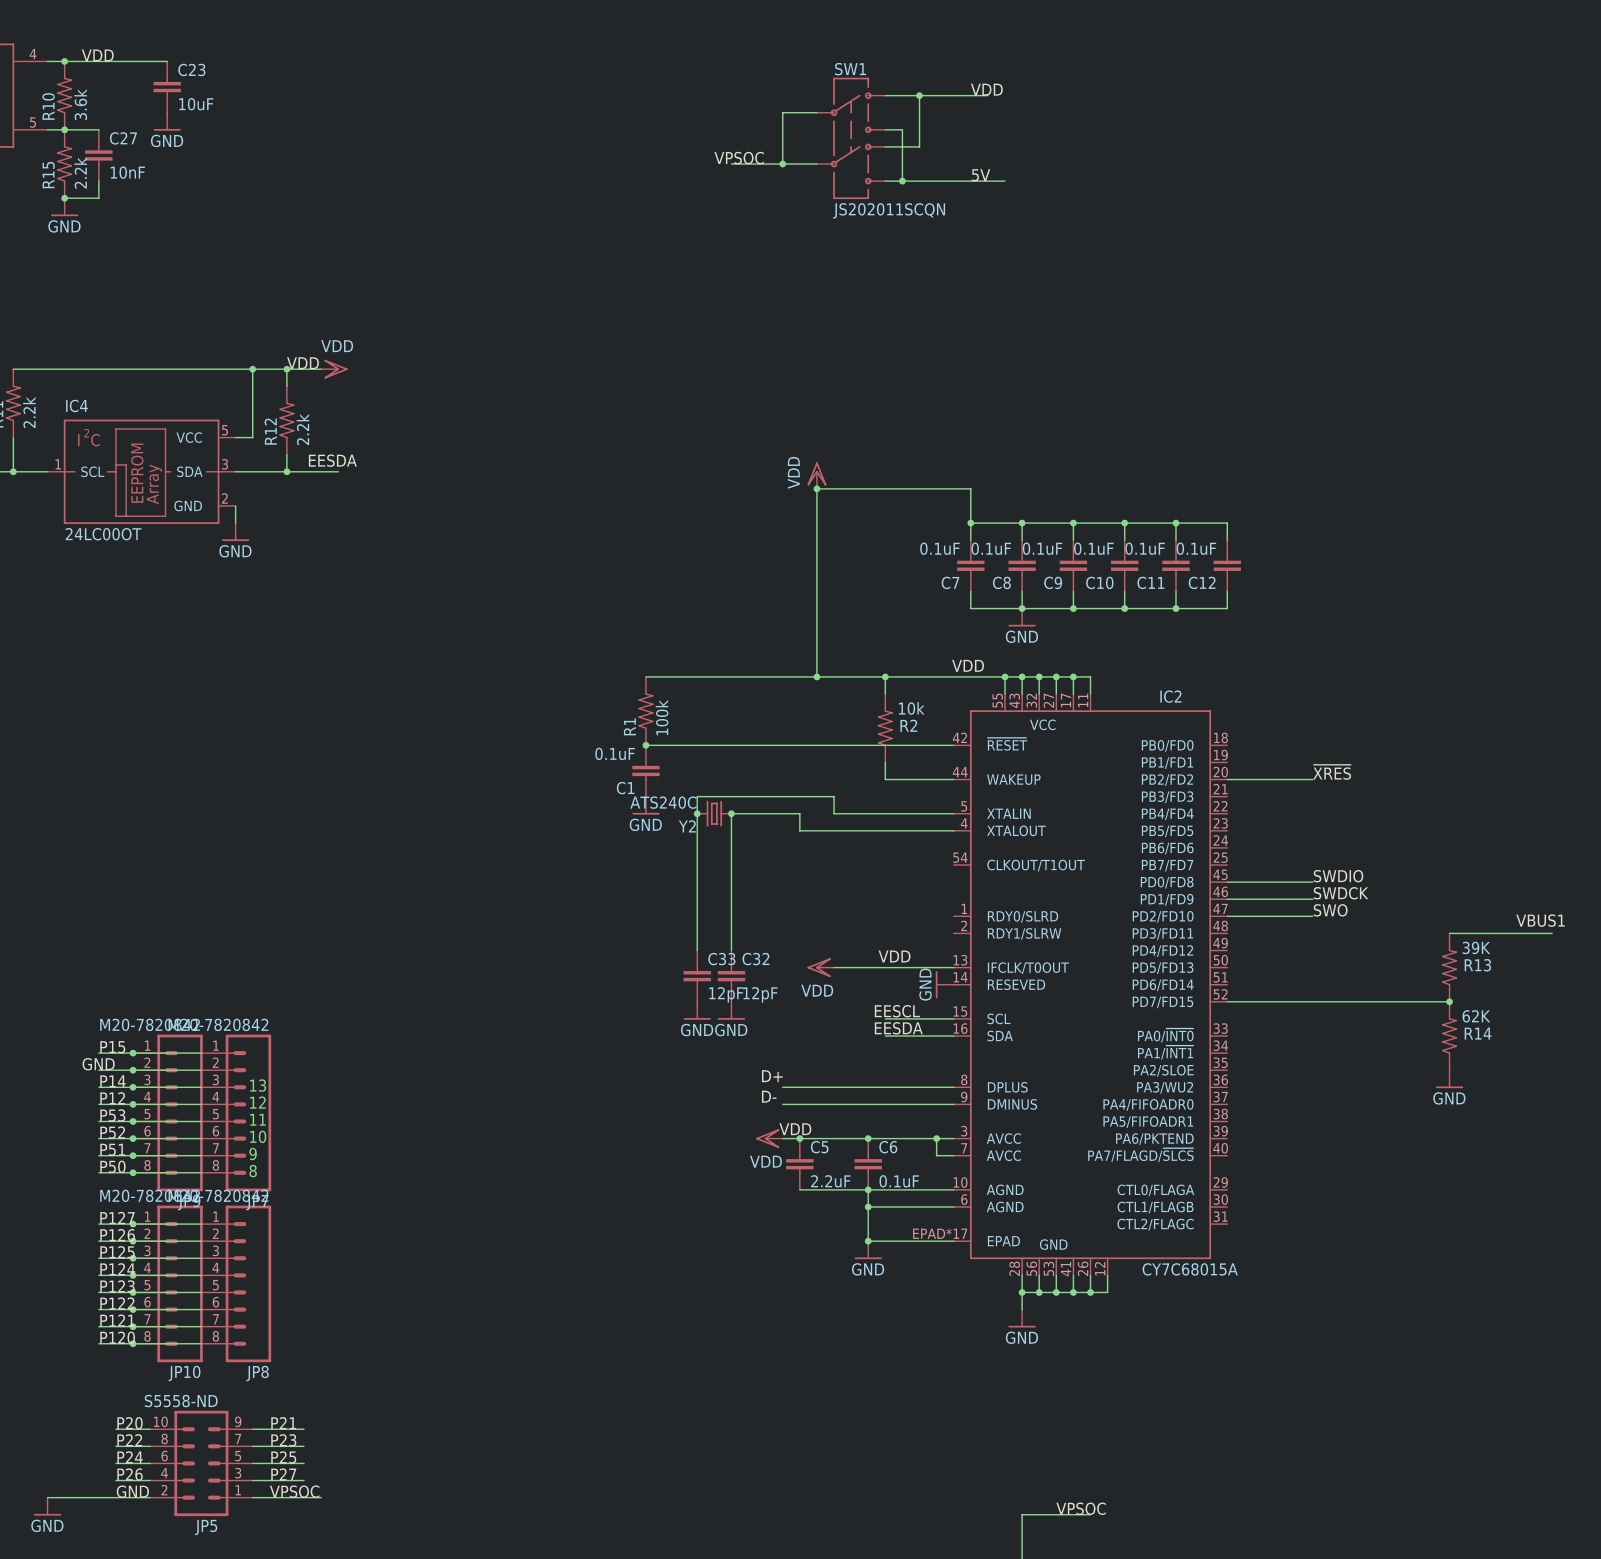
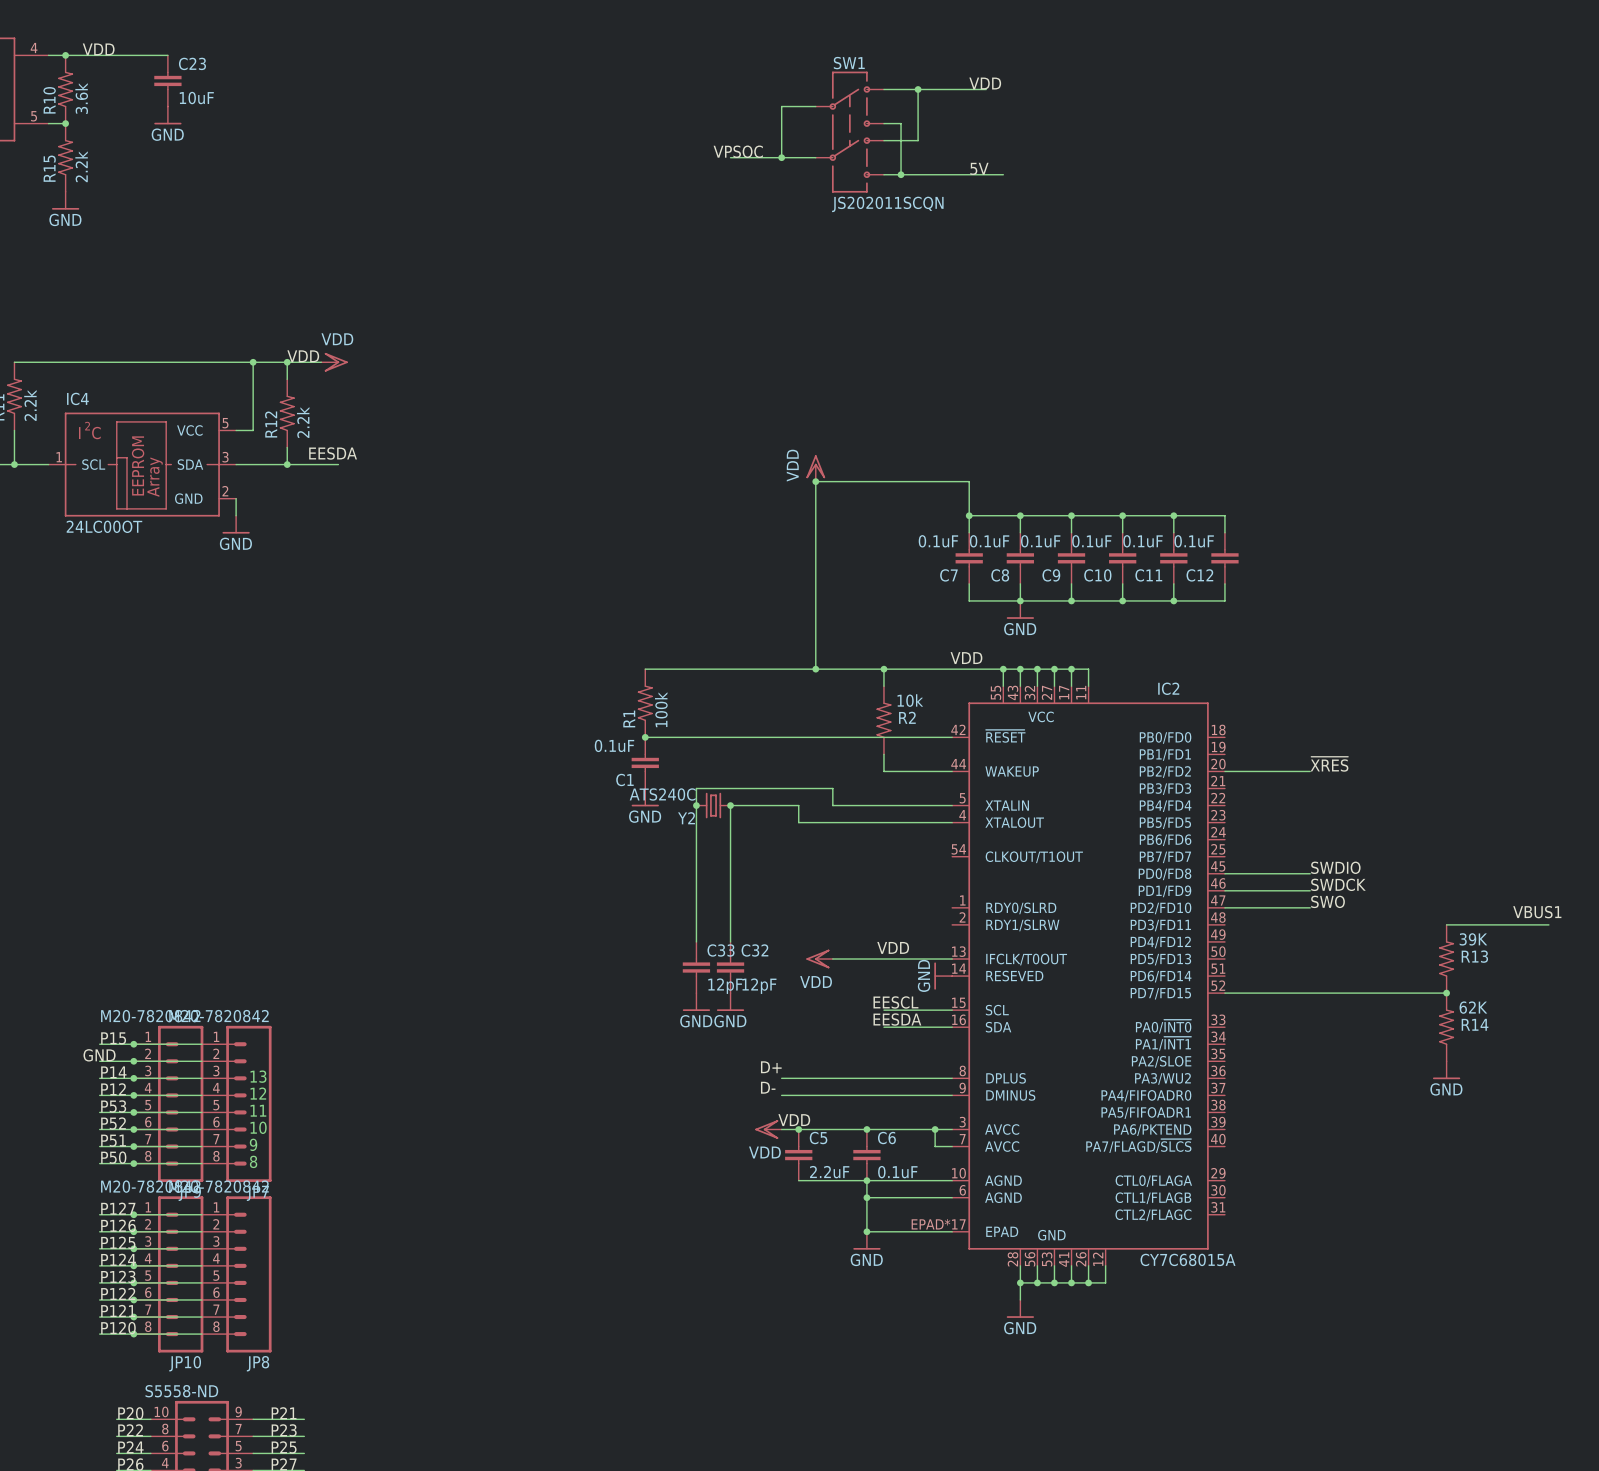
wire: (64, 129) (98, 129) -> none
C27: 10nF (98, 155) -> none
wire: (98, 181) (98, 198) (64, 198) -> none
junction: (64, 198) -> none

